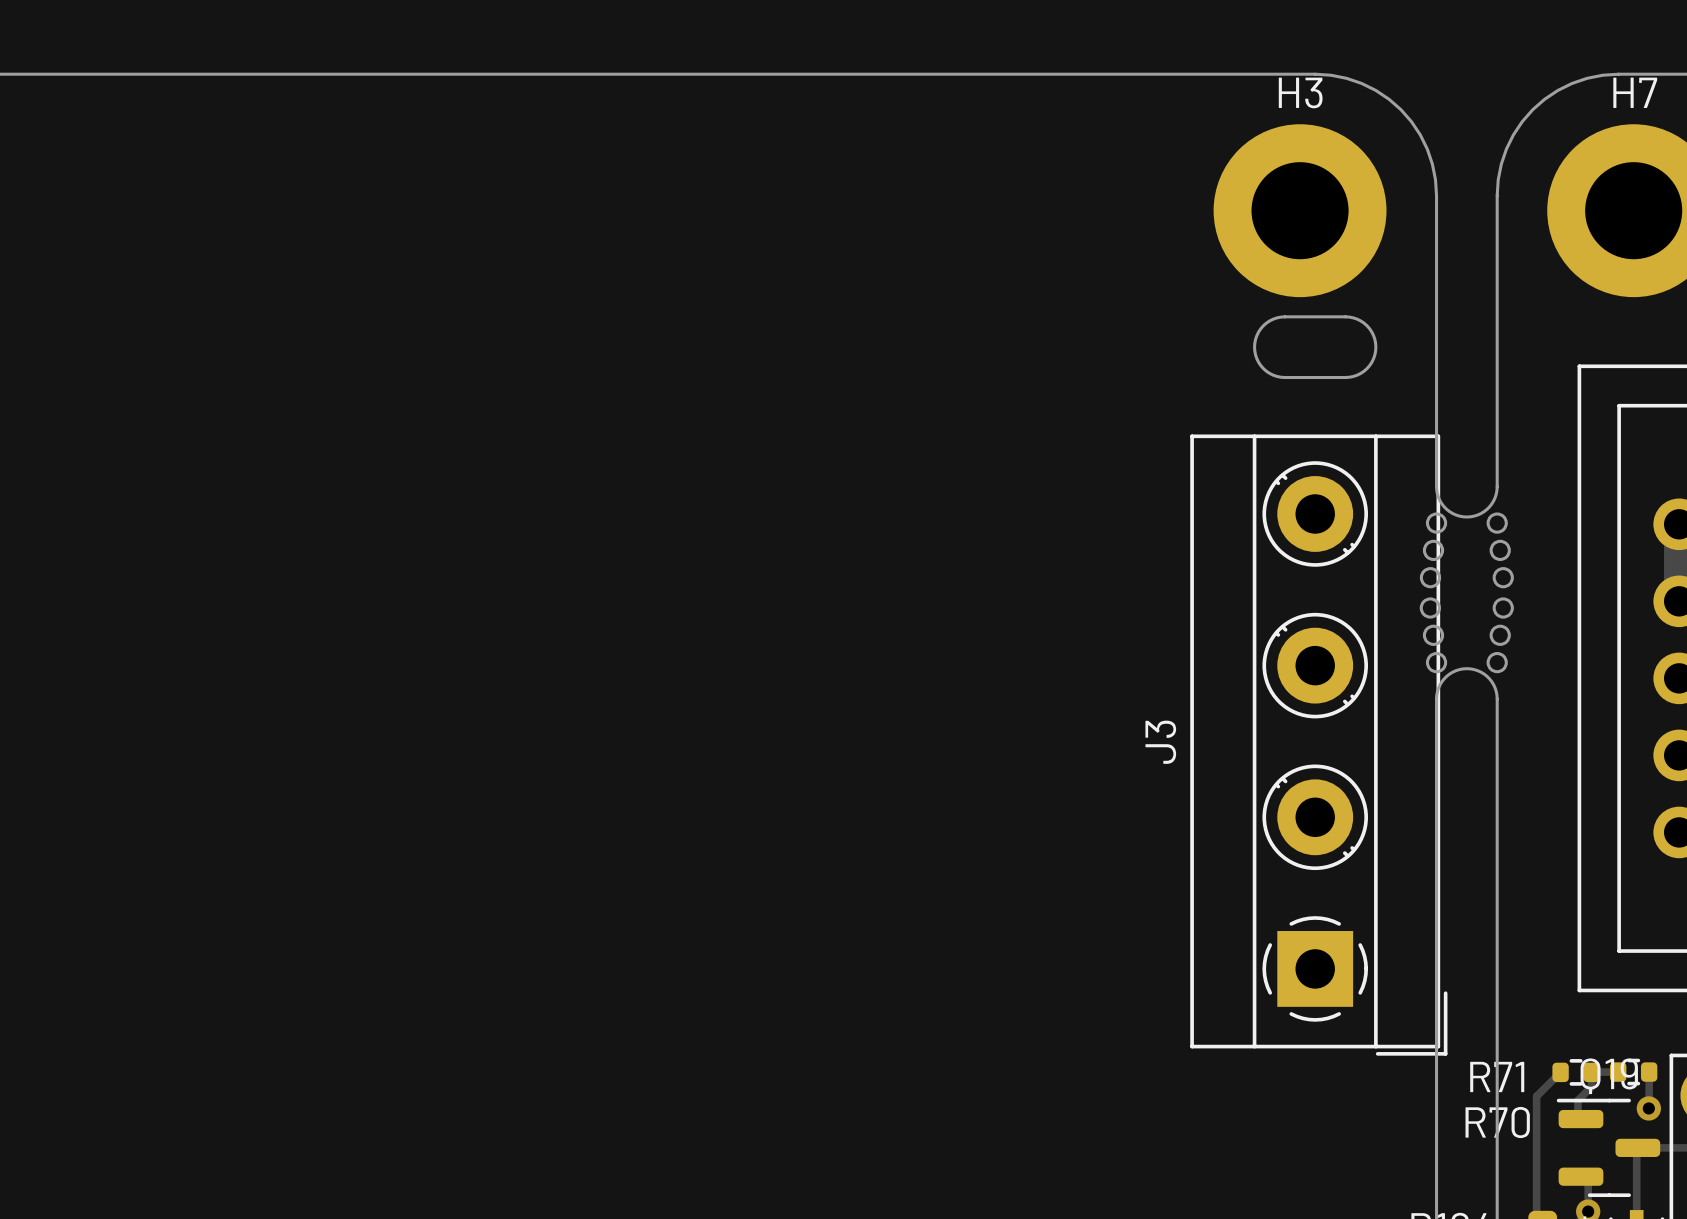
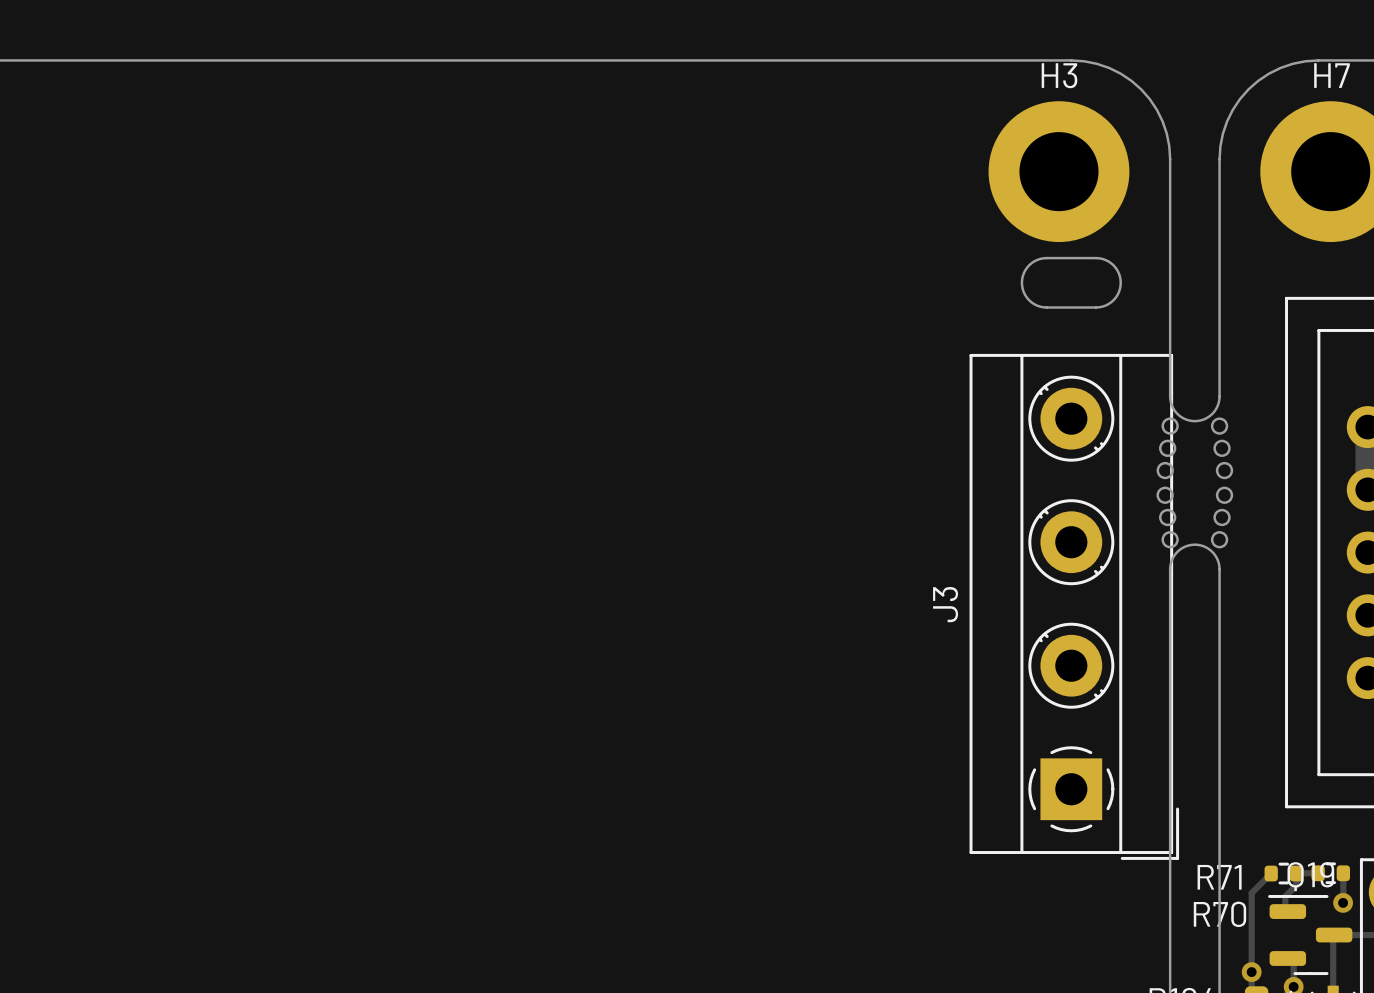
via: none -> (1251, 972)

